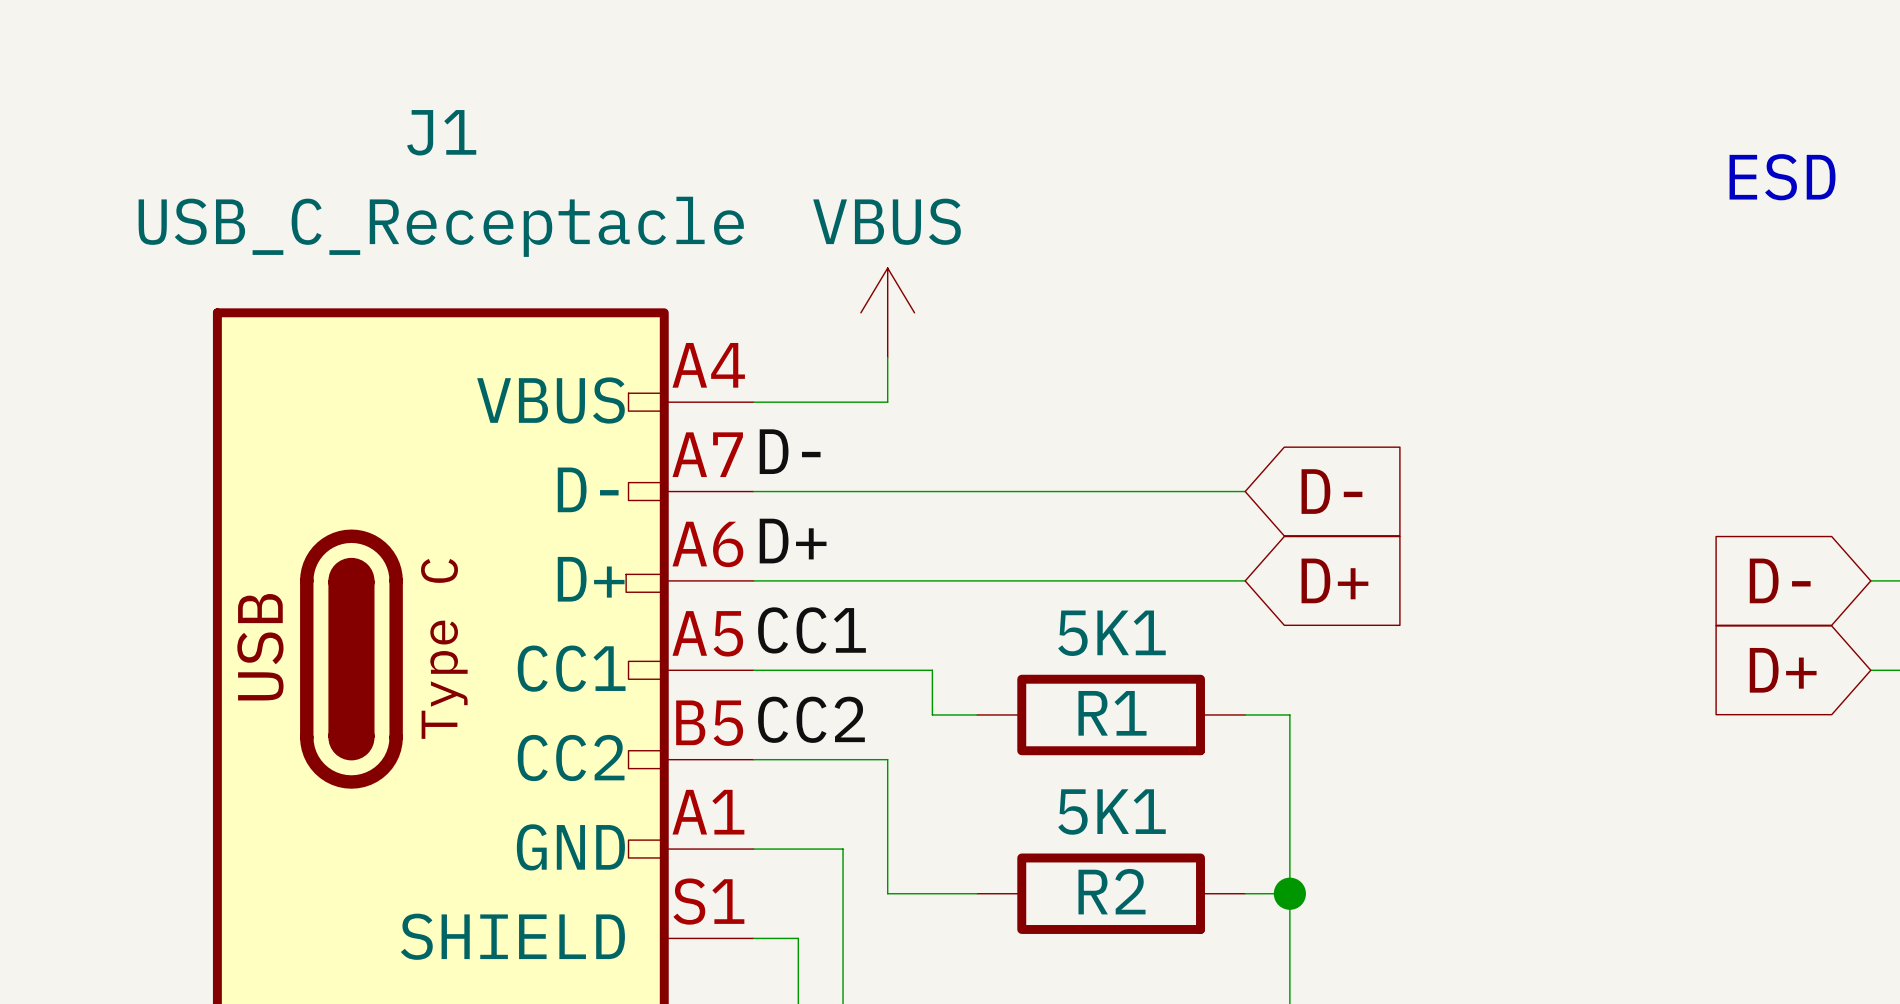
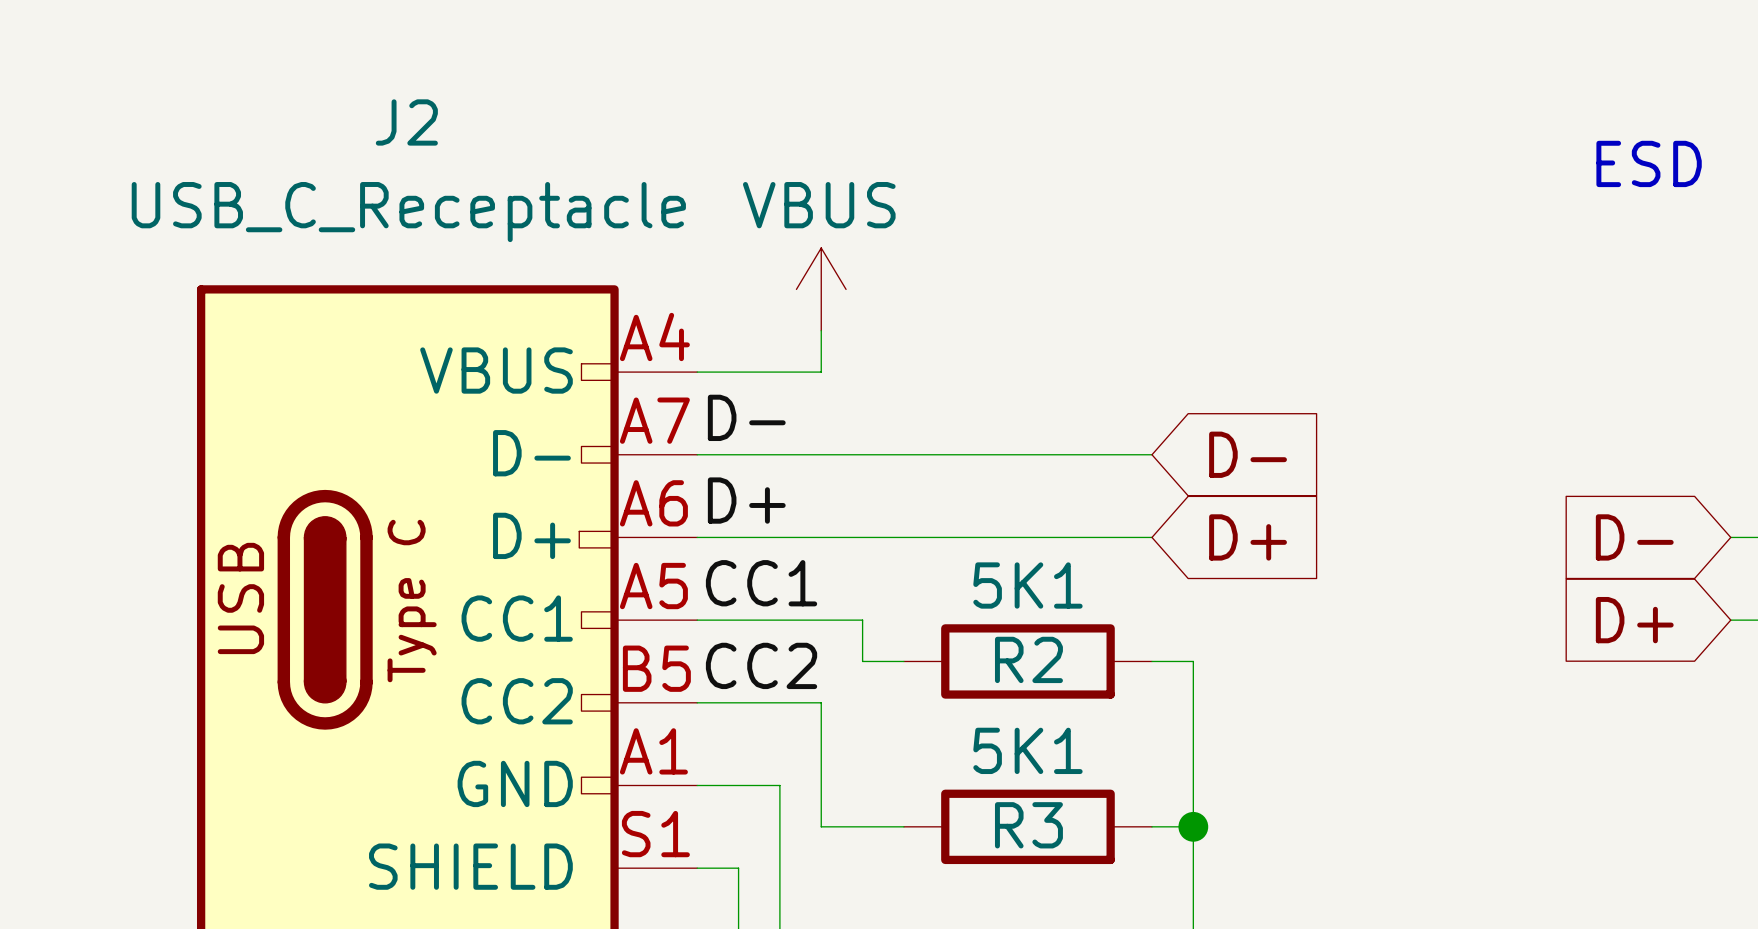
J1 name: J1 (441, 132) -> J2 (406, 122)
R1 name: R1 (1112, 713) -> R2 (1028, 659)
R2 name: R2 (1112, 891) -> R3 (1028, 825)

